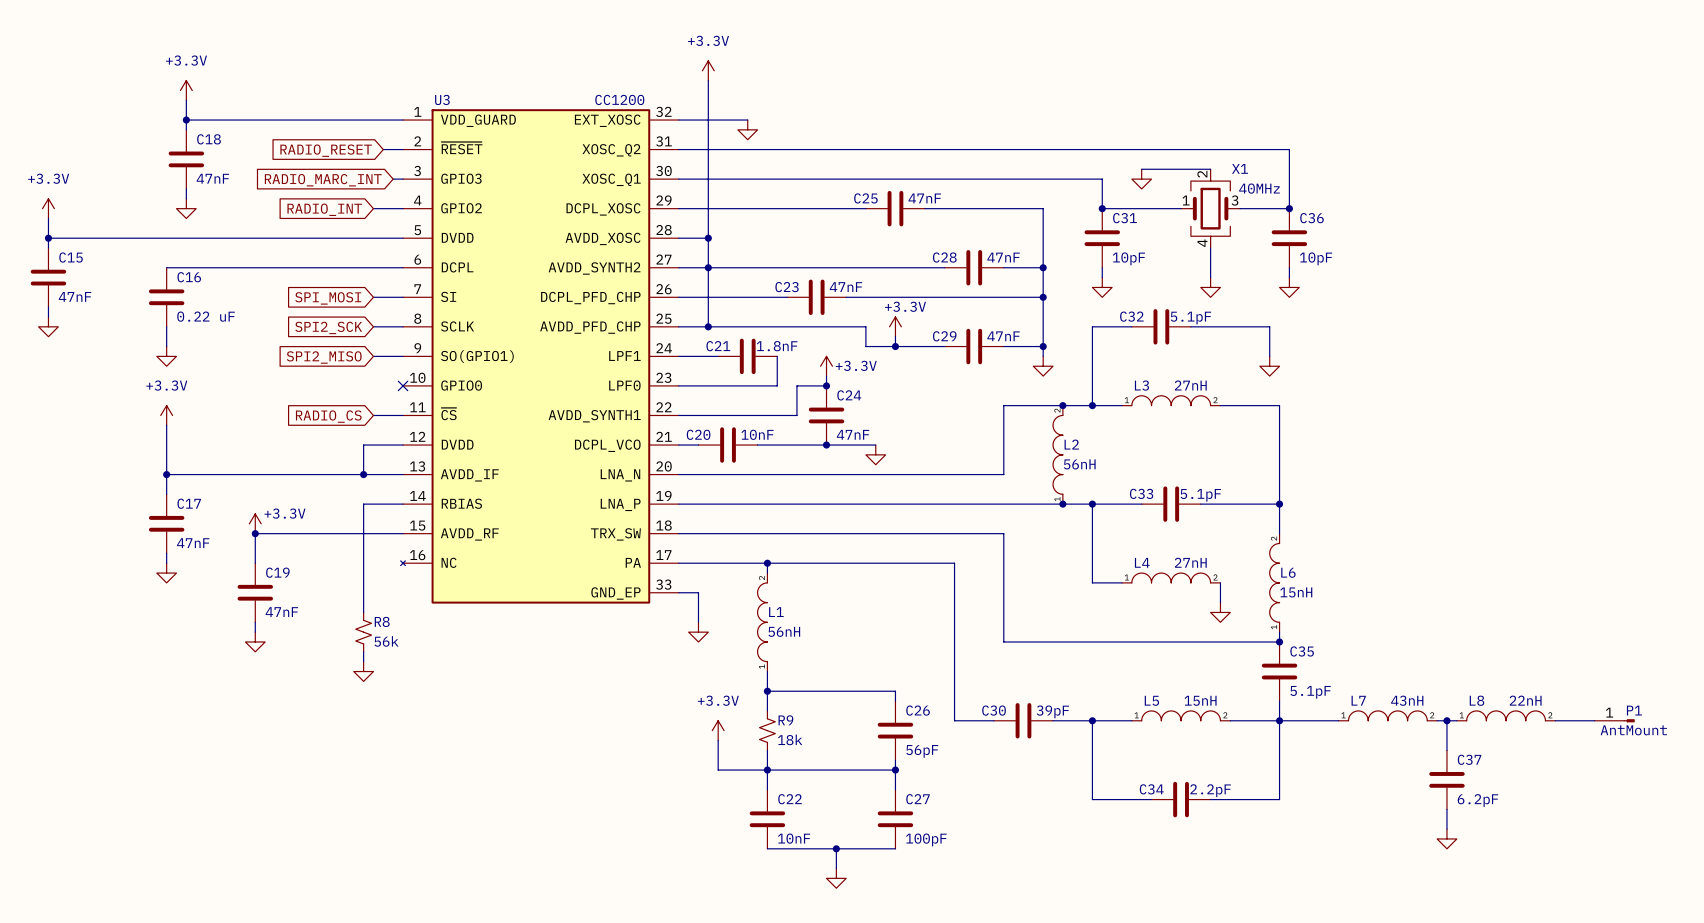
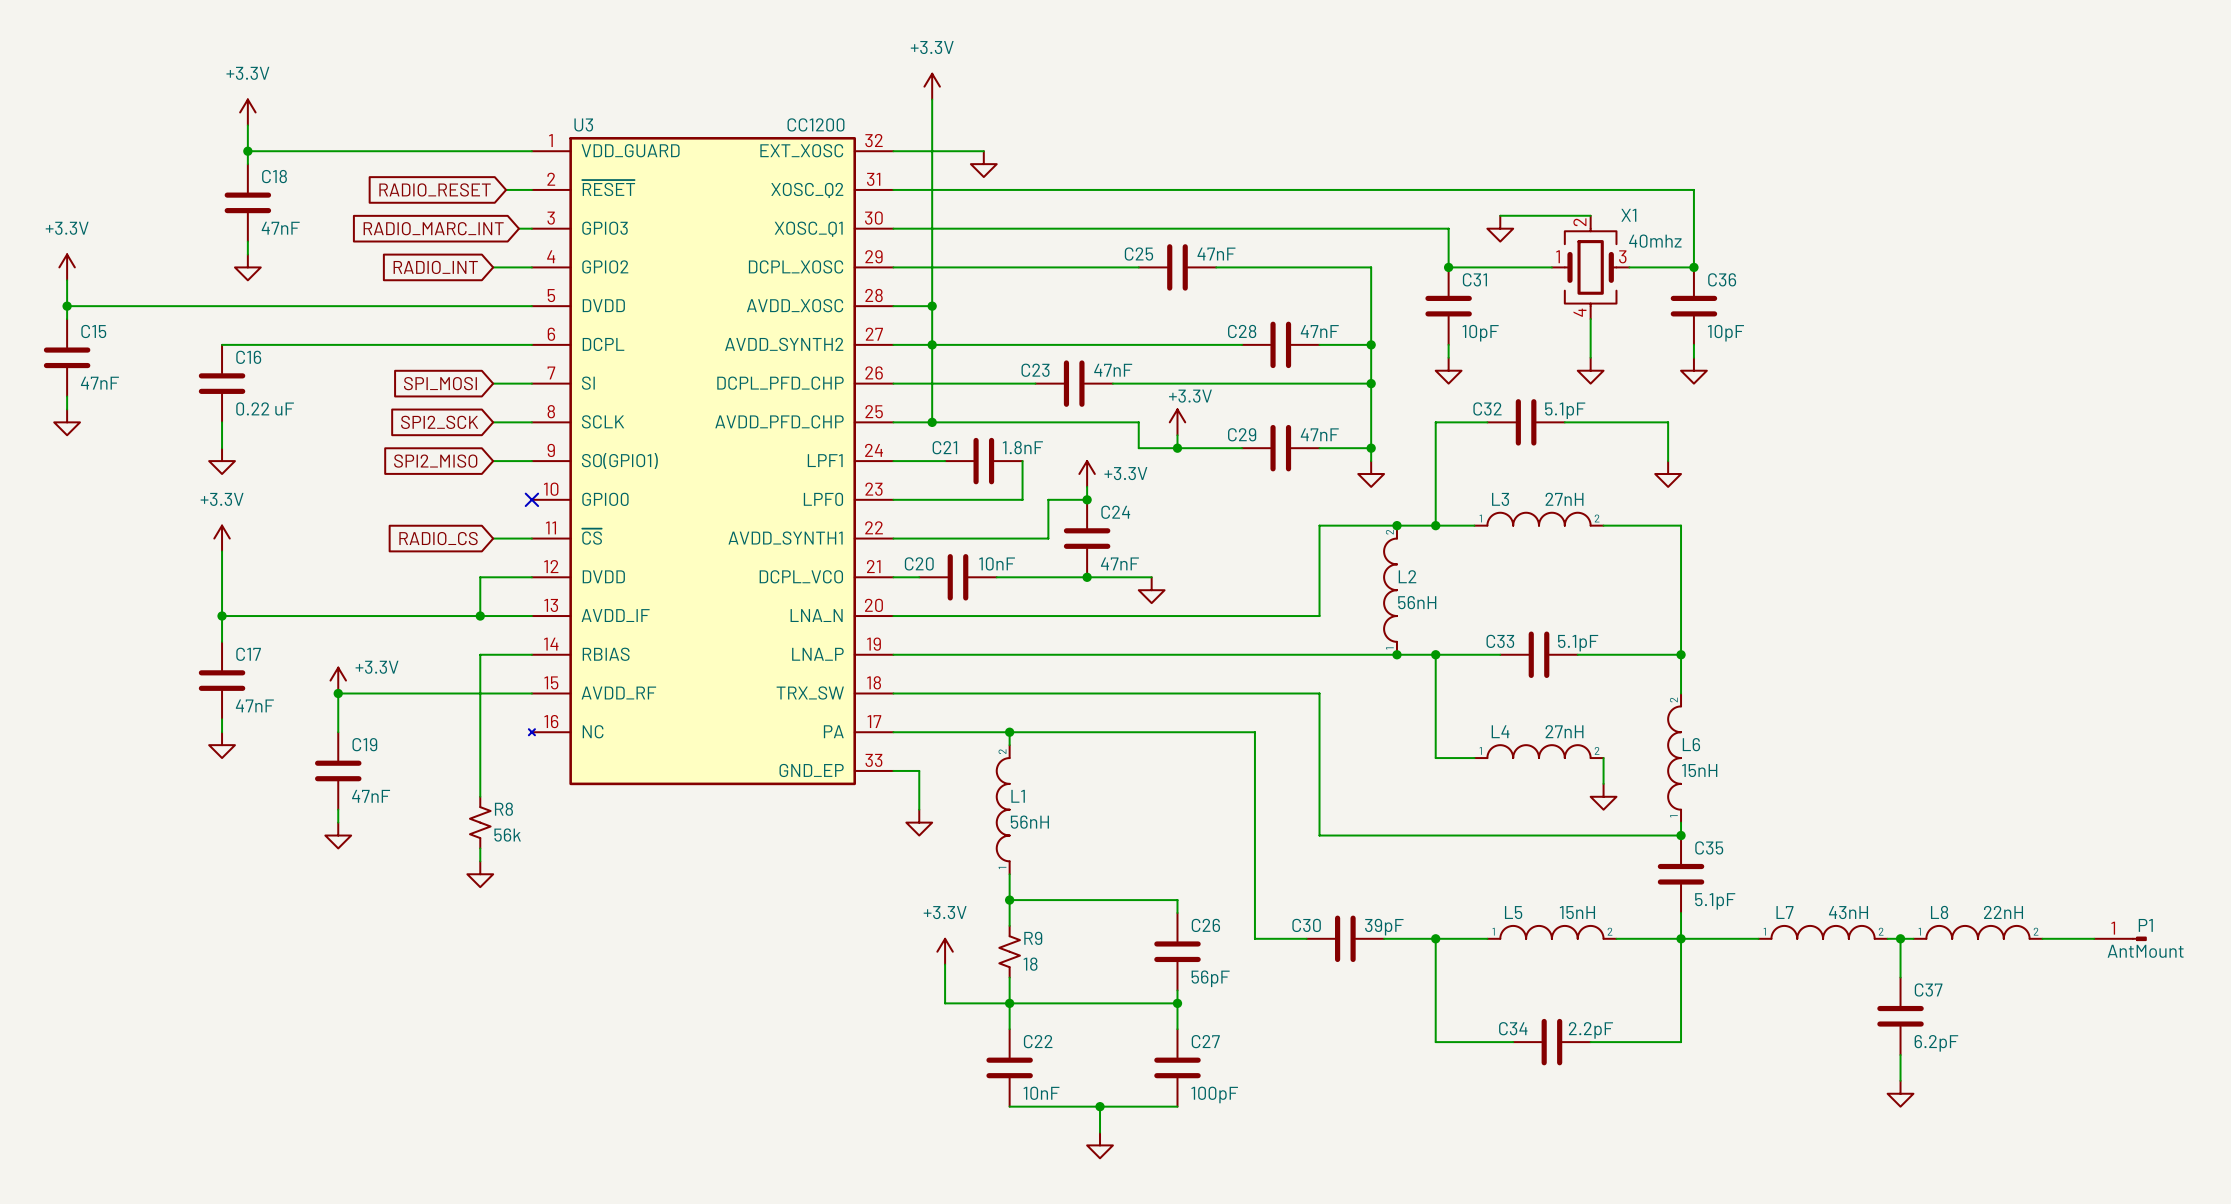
X1 value: 40MHz (1259, 188) -> 40mhz (1655, 241)
R9 value: 18k (790, 739) -> 18 (1030, 964)

